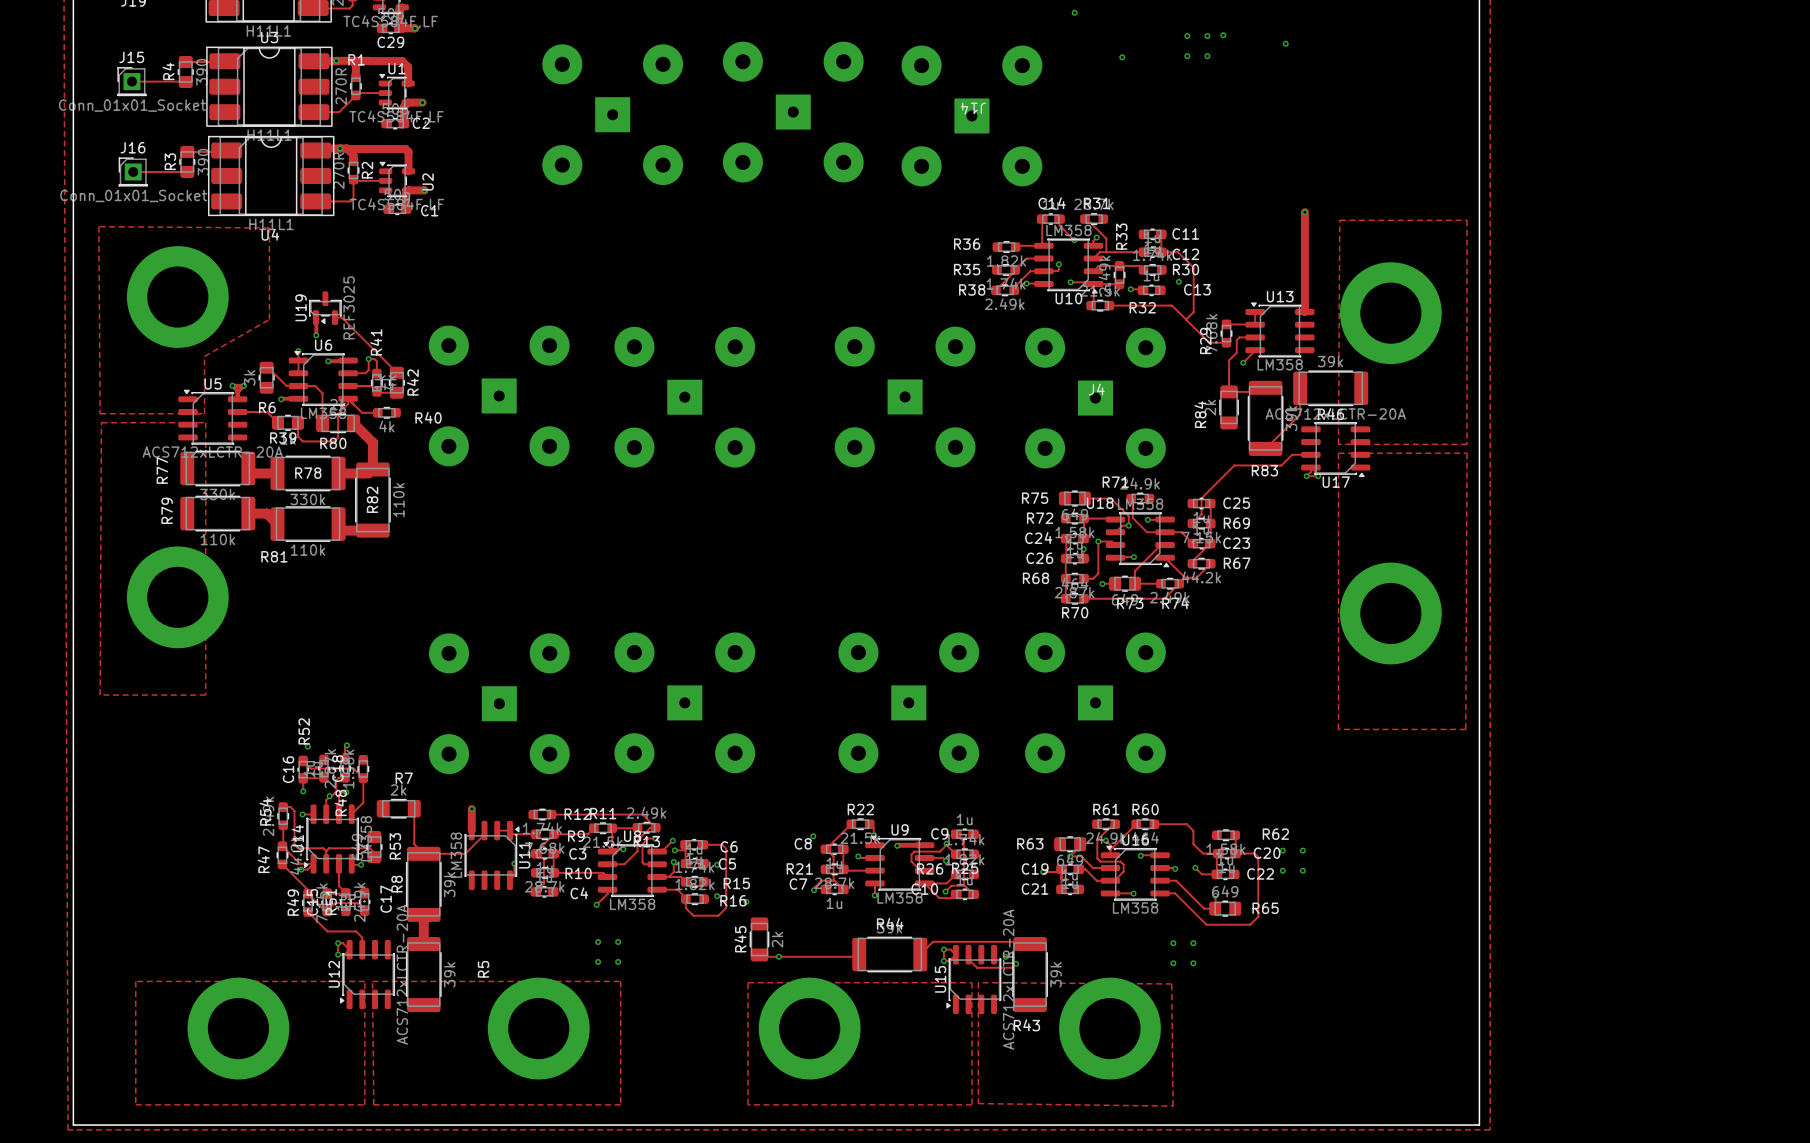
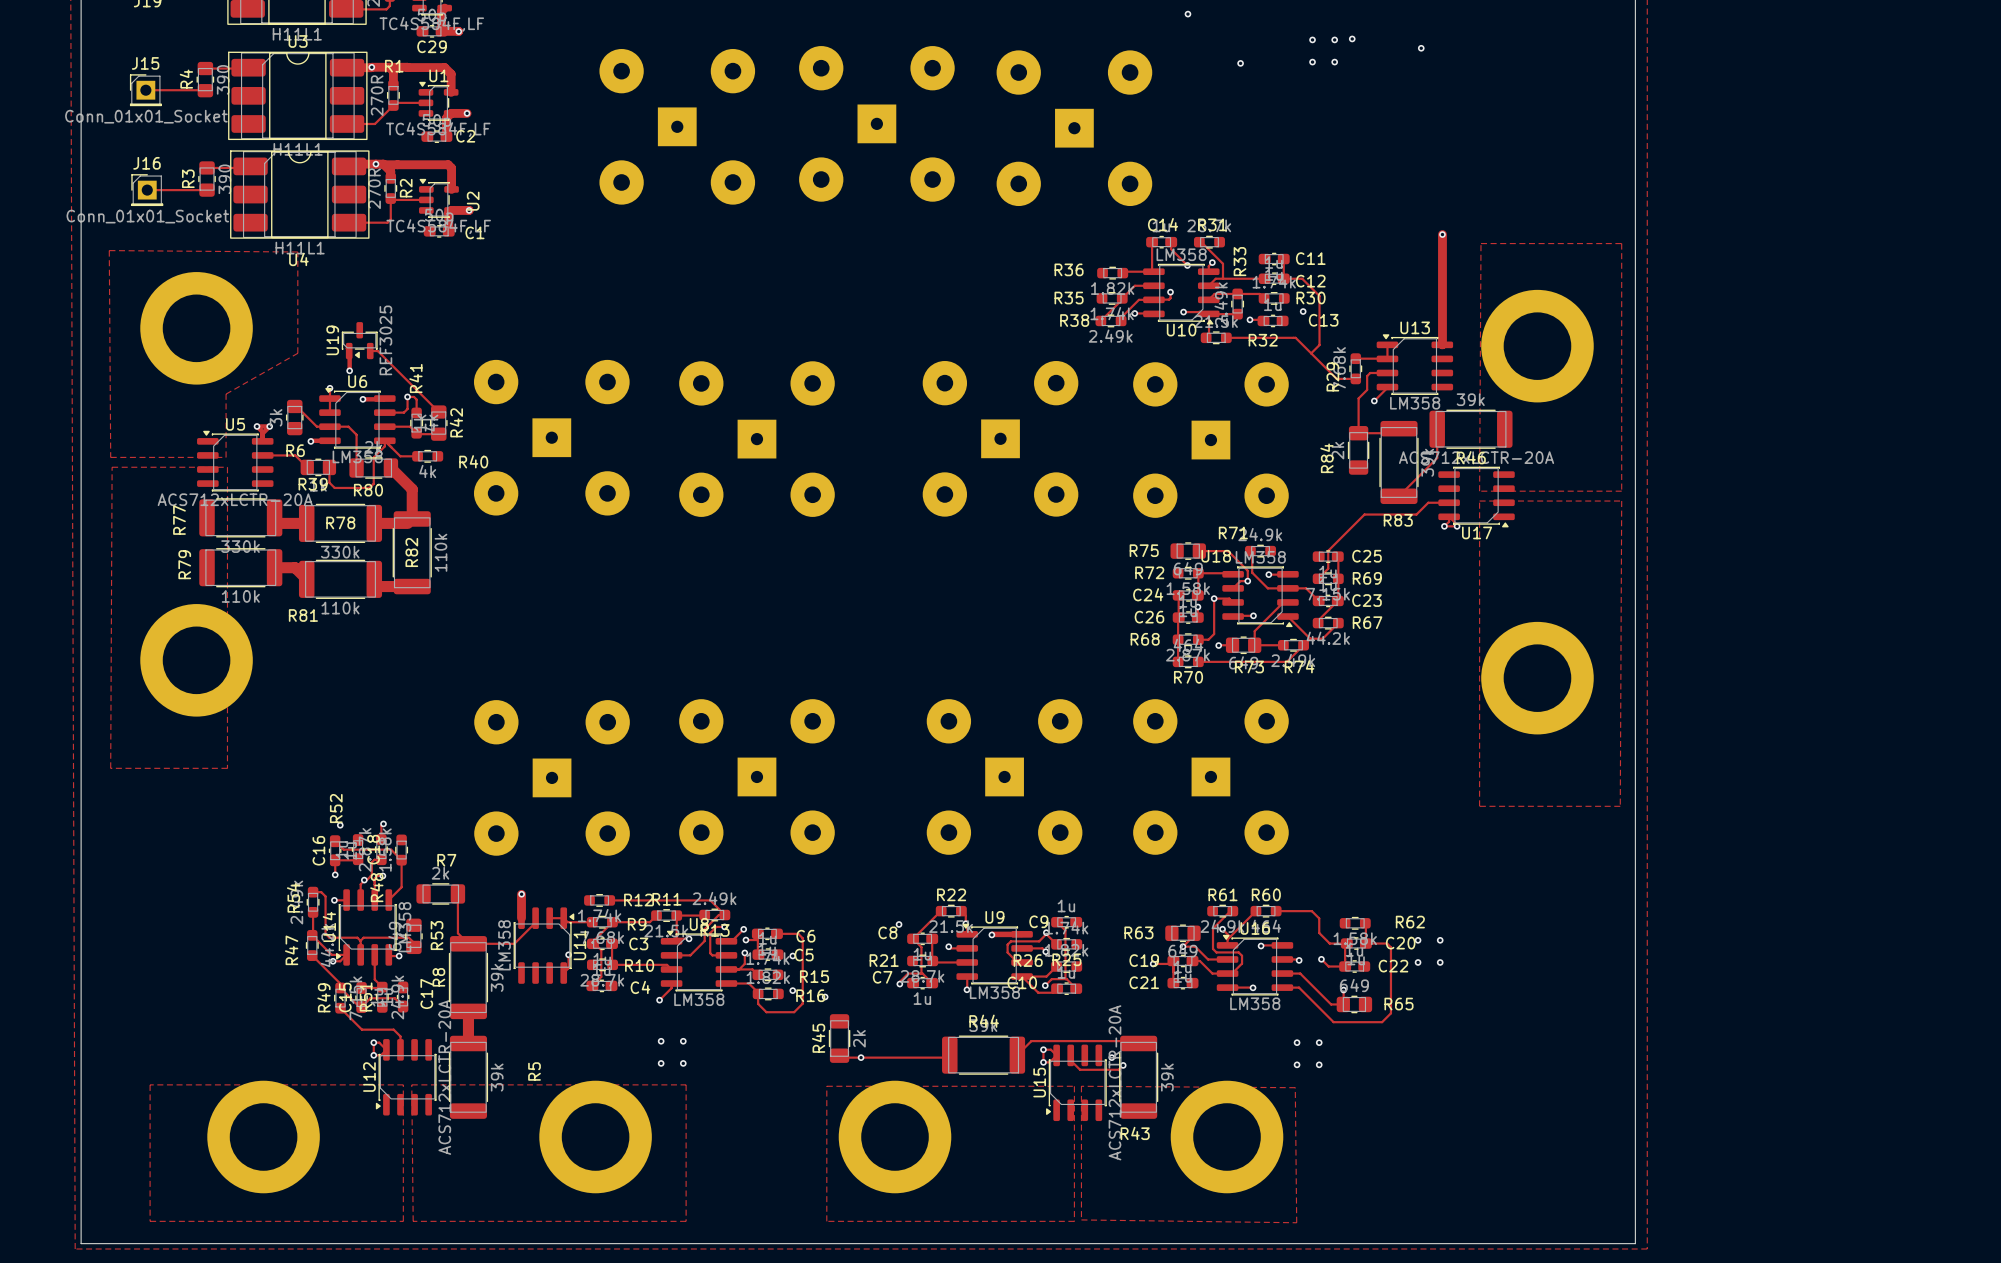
J14 name: J14 (973, 108) -> none
J4 name: J4 (1096, 389) -> none

